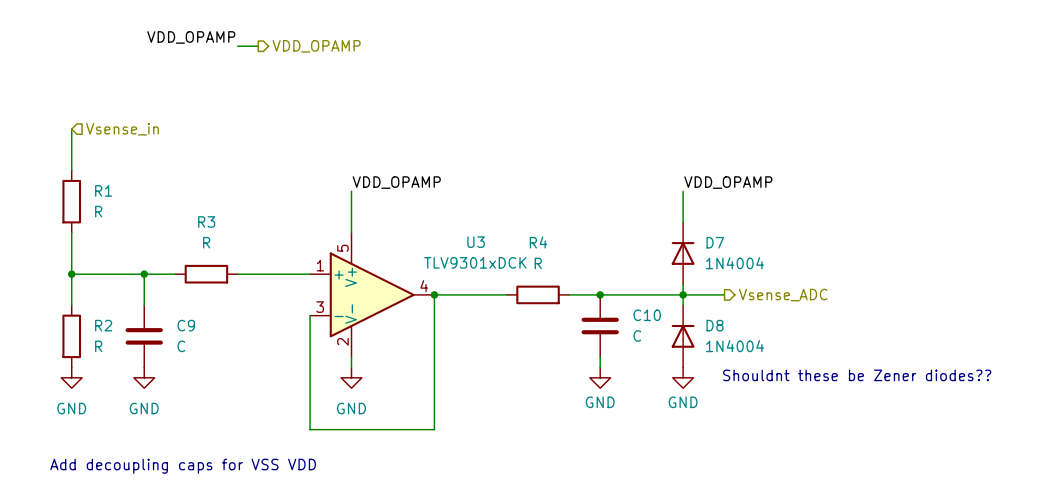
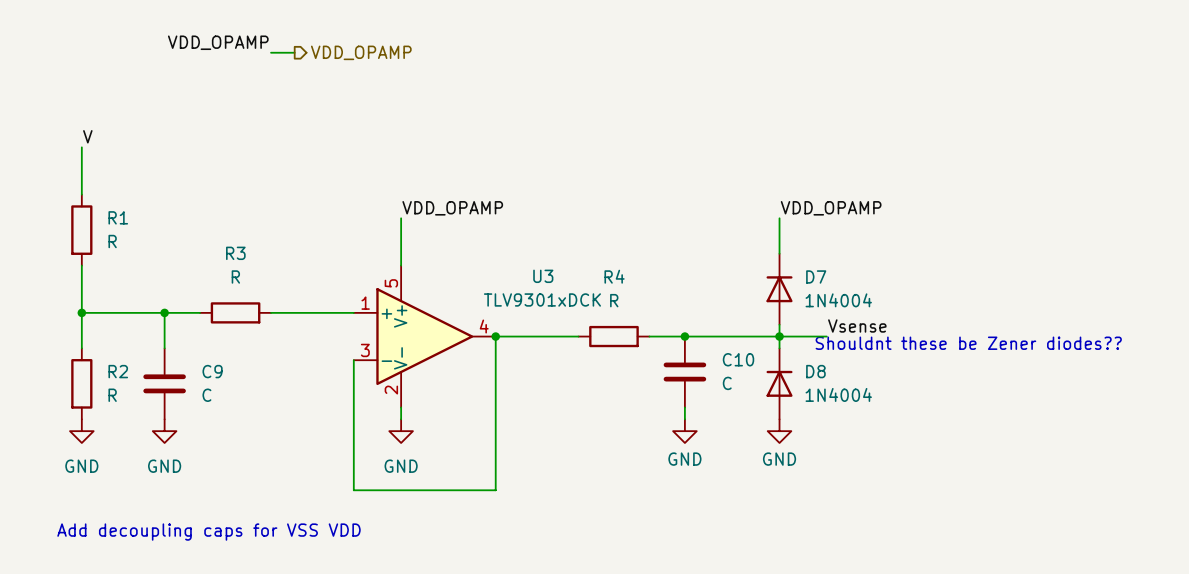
label: none -> V (87, 136)
hierarchical label: Vsense_in (122, 129) -> none
label: none -> Vsense (857, 326)
hierarchical label: Vsense_ADC (783, 295) -> none
text position: Shouldnt these be Zener diodes?? (857, 375) -> Shouldnt these be Zener diodes?? (968, 343)

